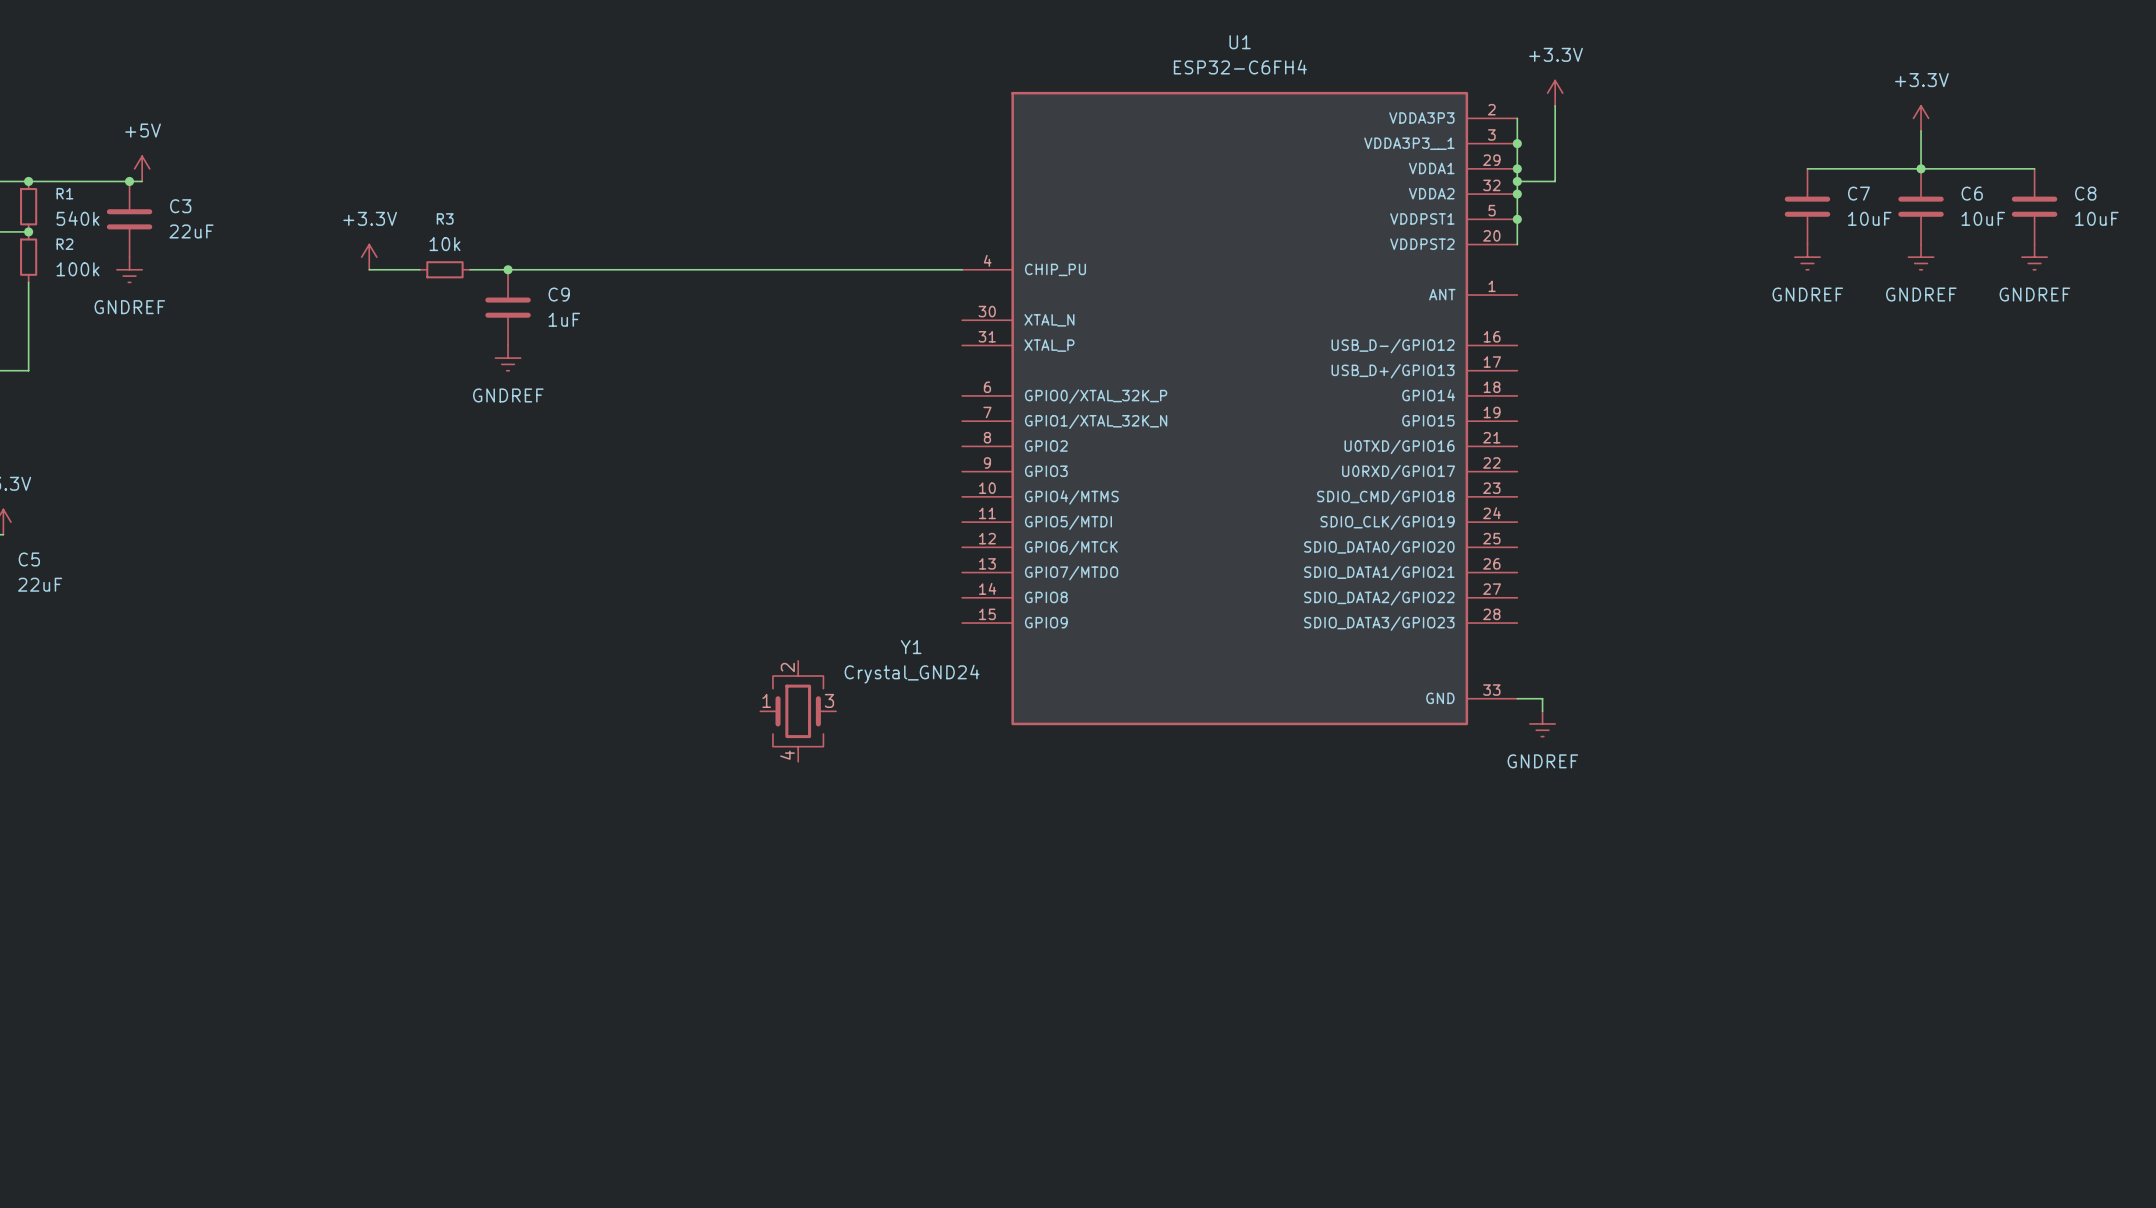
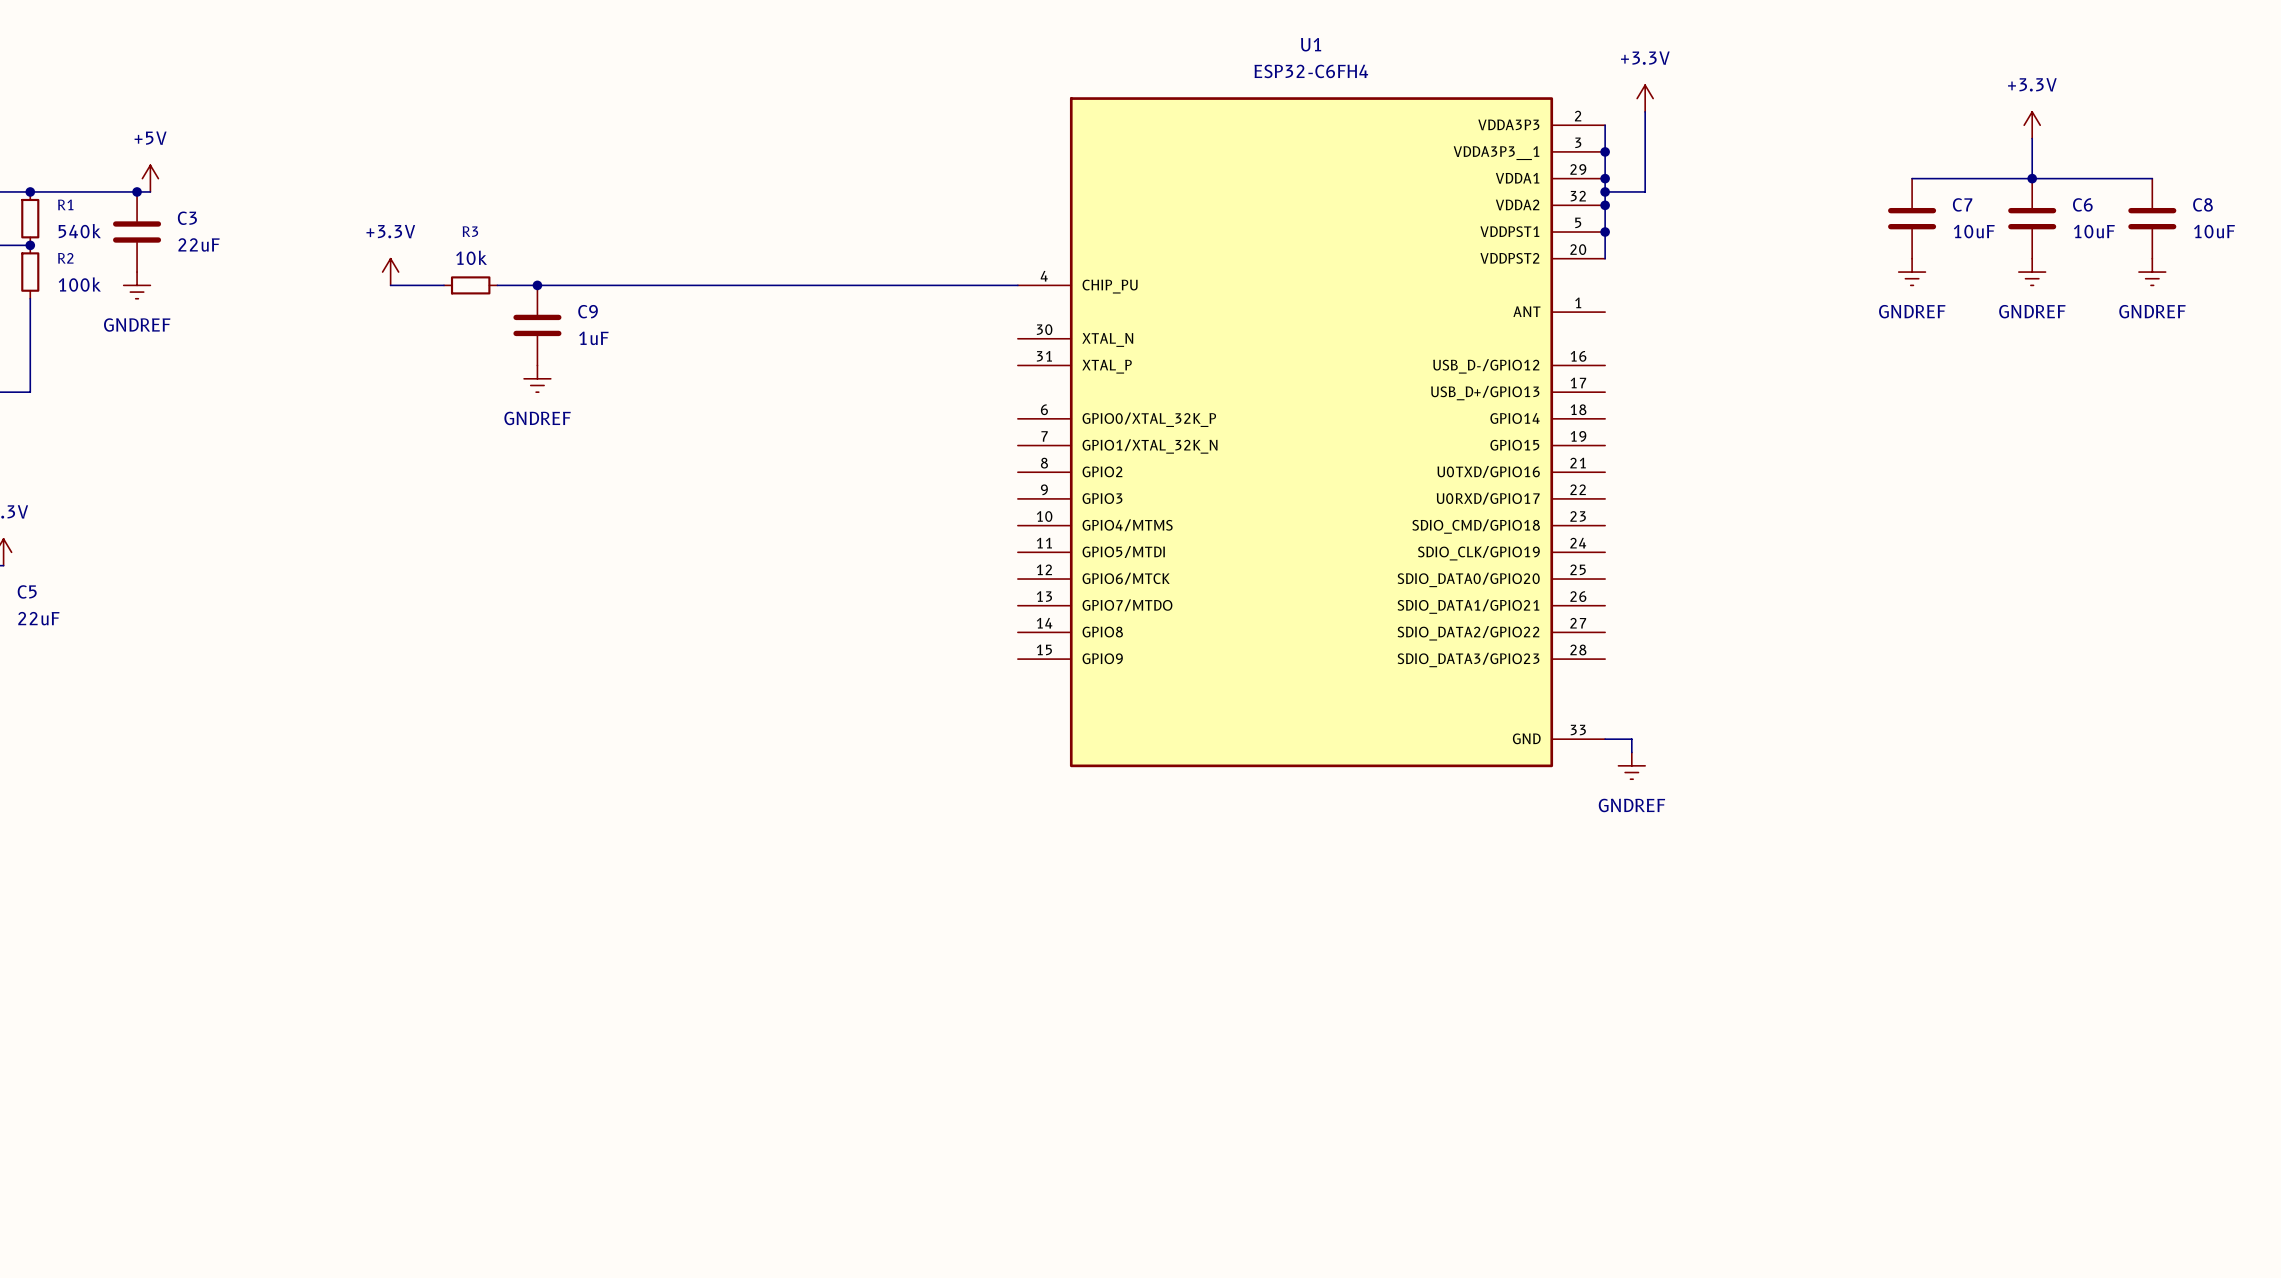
Y1: Crystal_GND24 (798, 711) -> none

